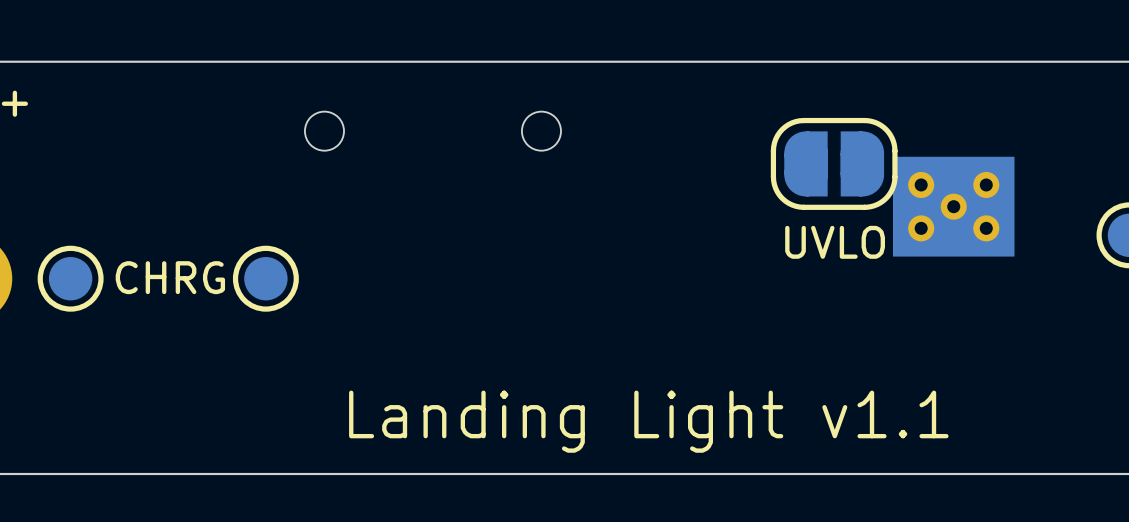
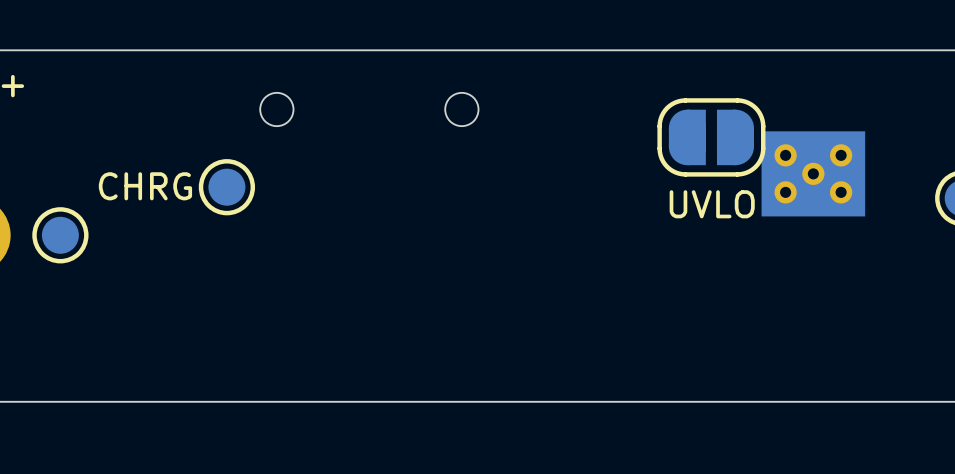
text position: CHRG (170, 277) -> CHRG (145, 186)
part position: (265, 278) -> (226, 187)
text: Landing Light v1.1 (648, 421) -> none

